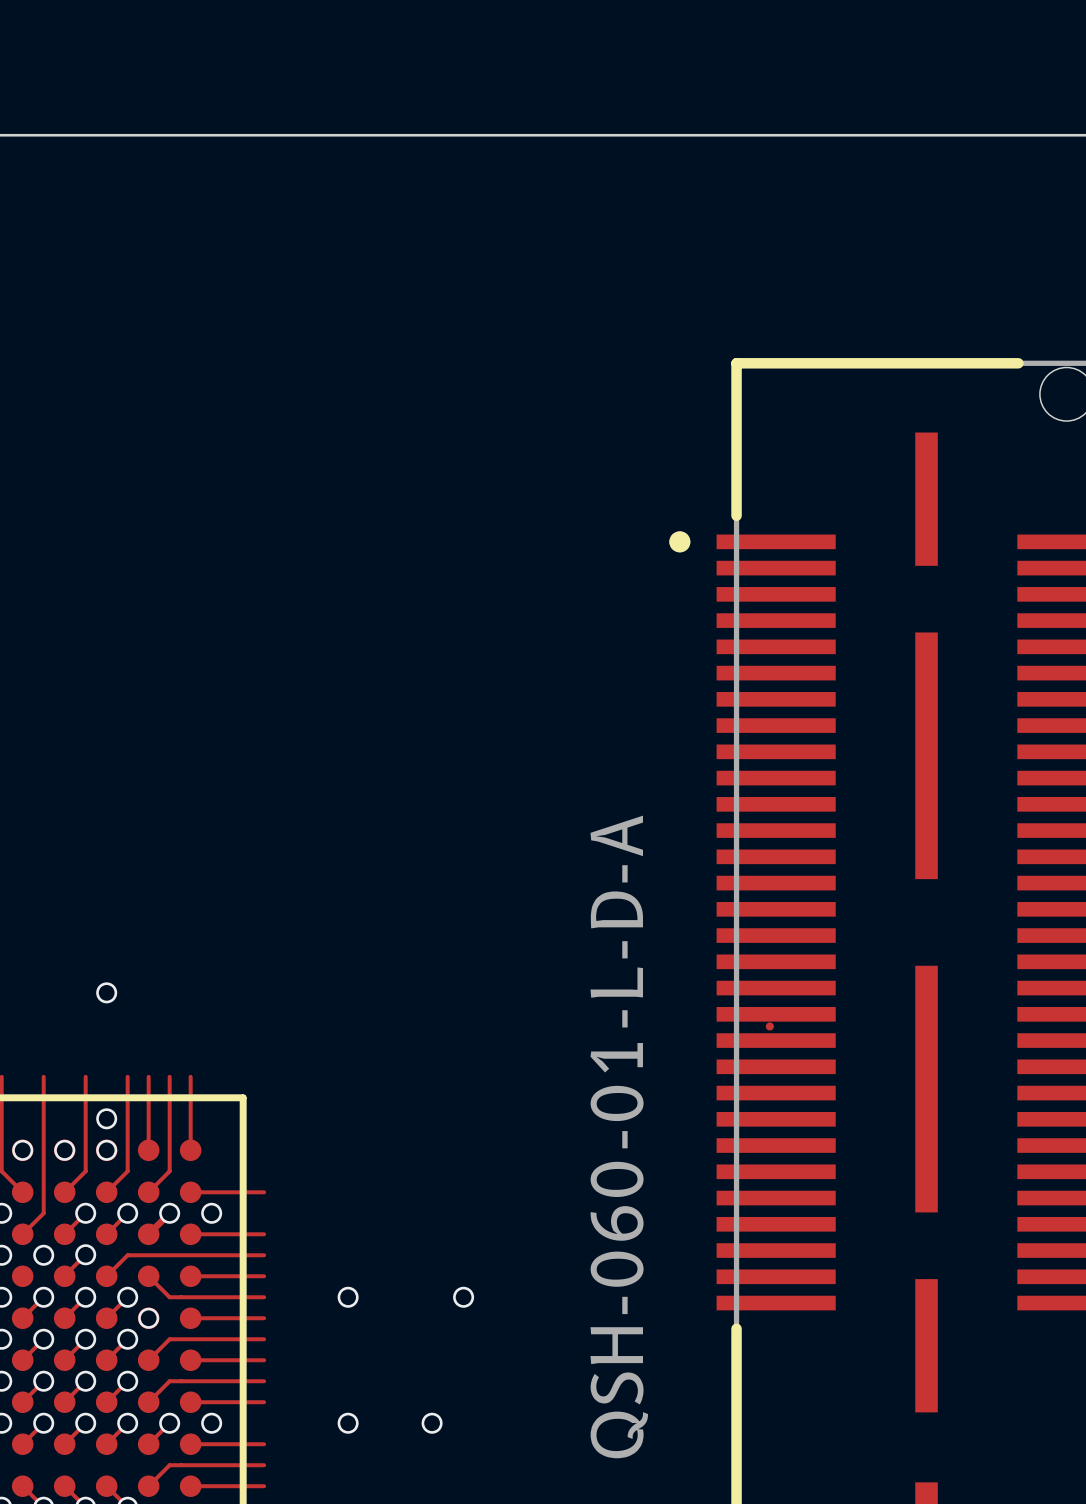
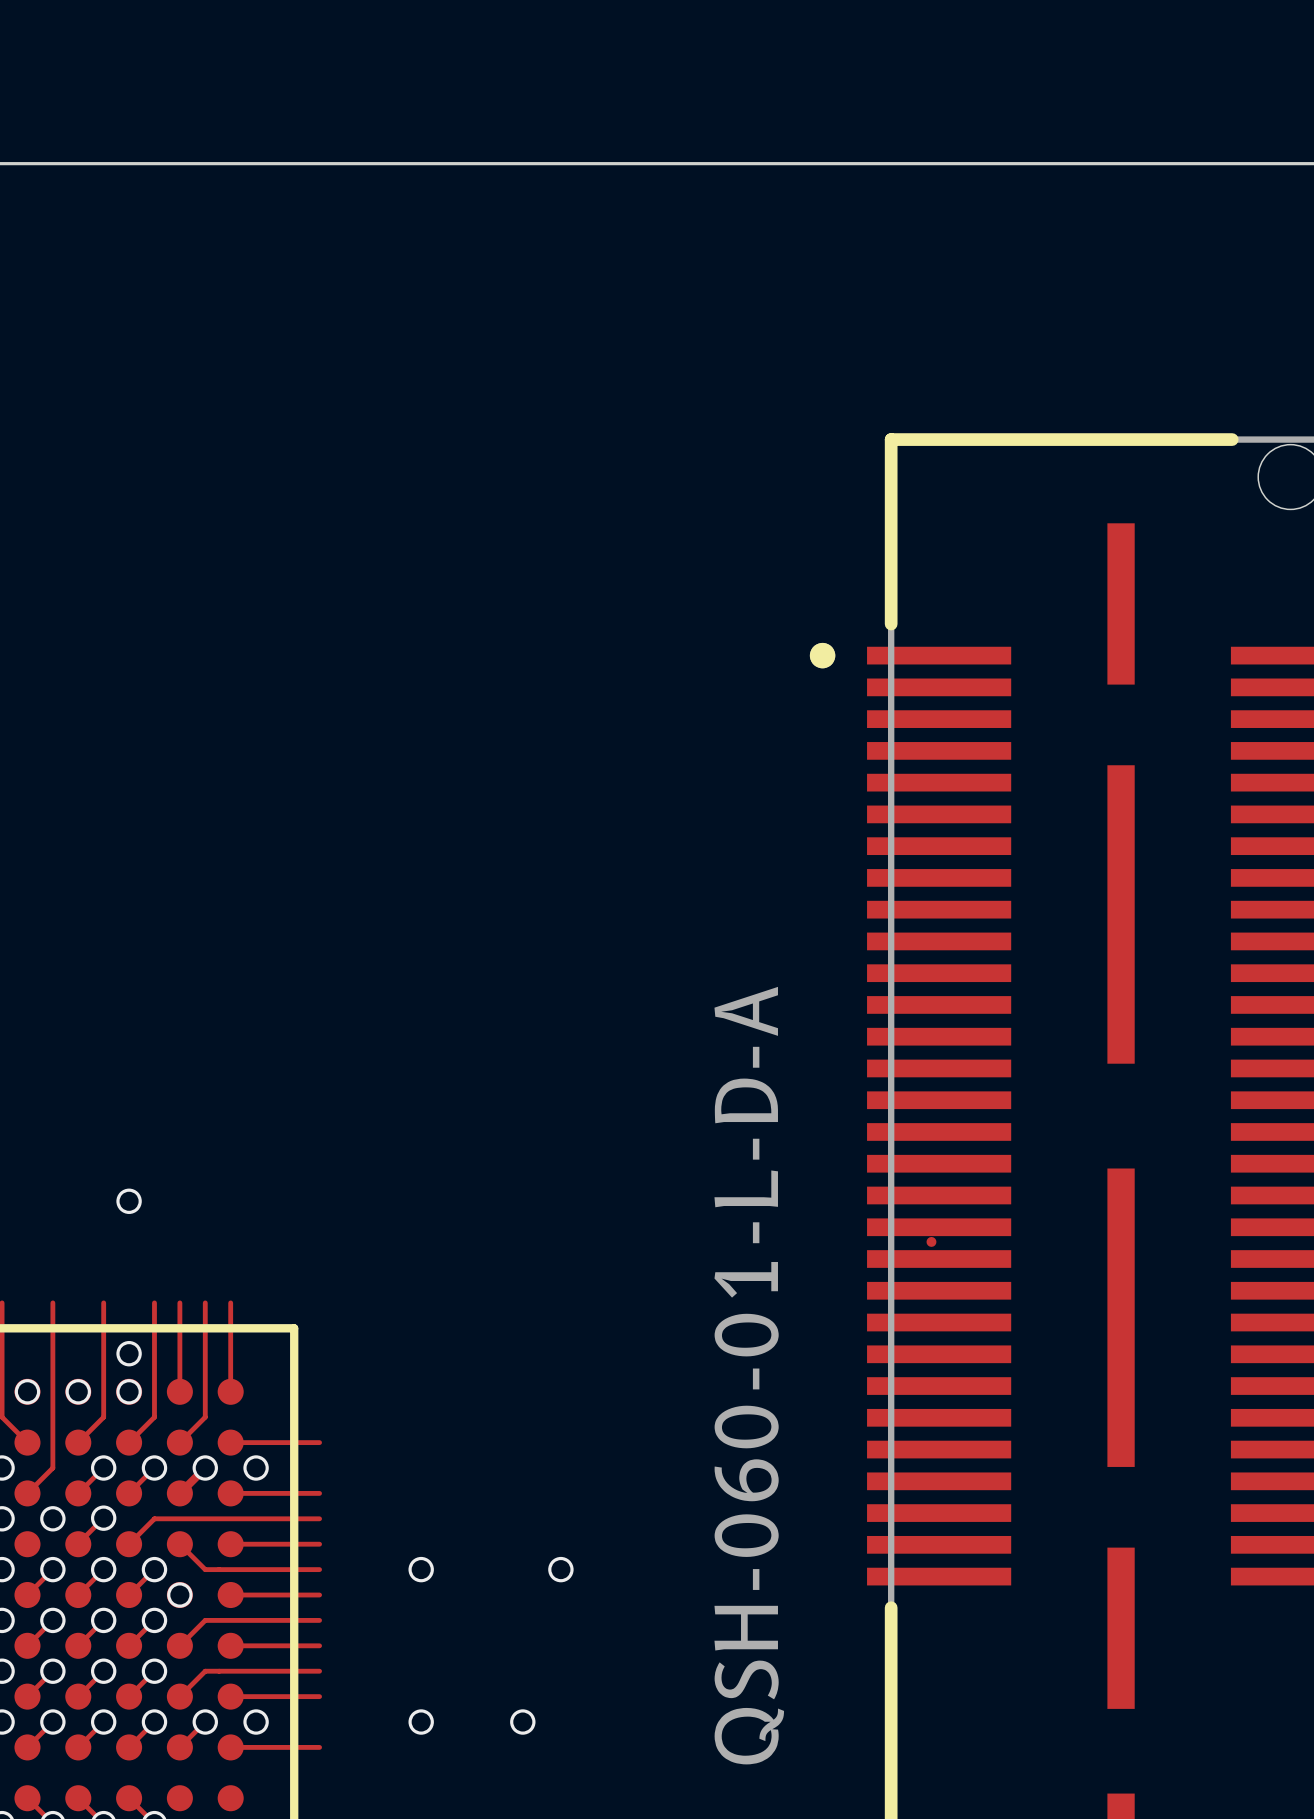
track: (264, 1465) (169, 1465) (148, 1486) -> none
track: (190, 1486) (264, 1486) -> none

